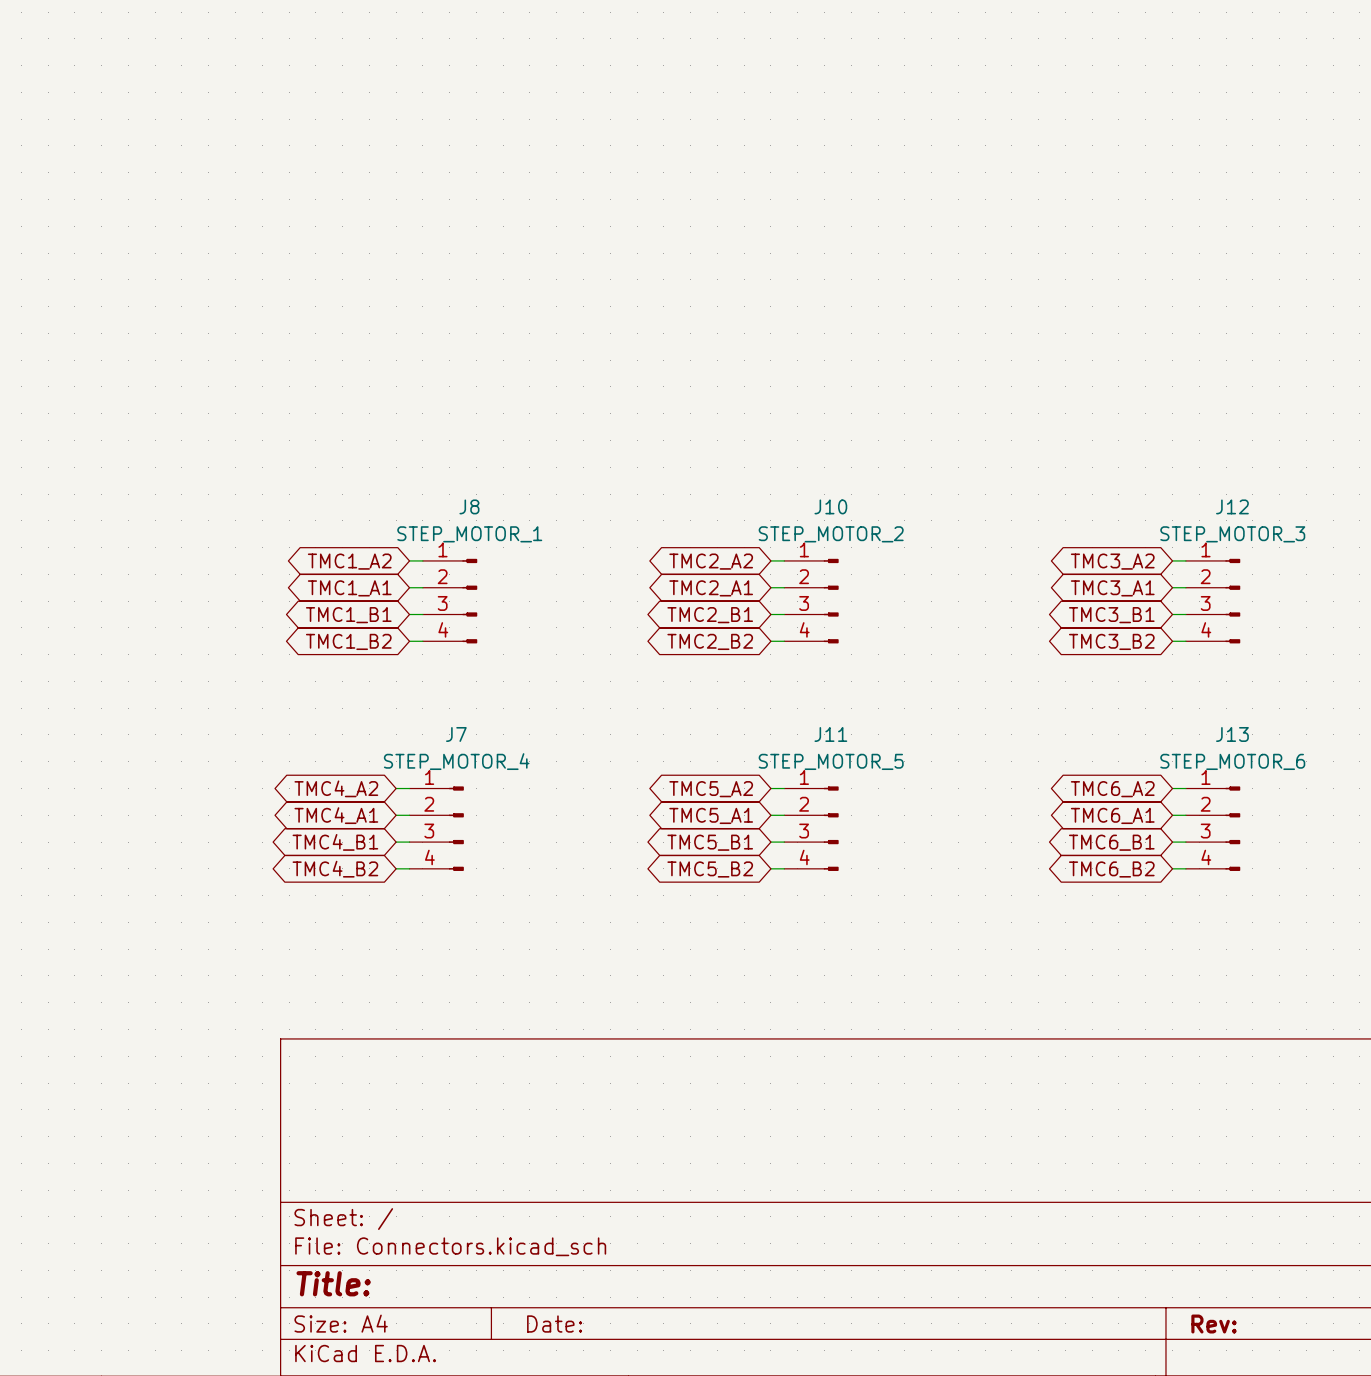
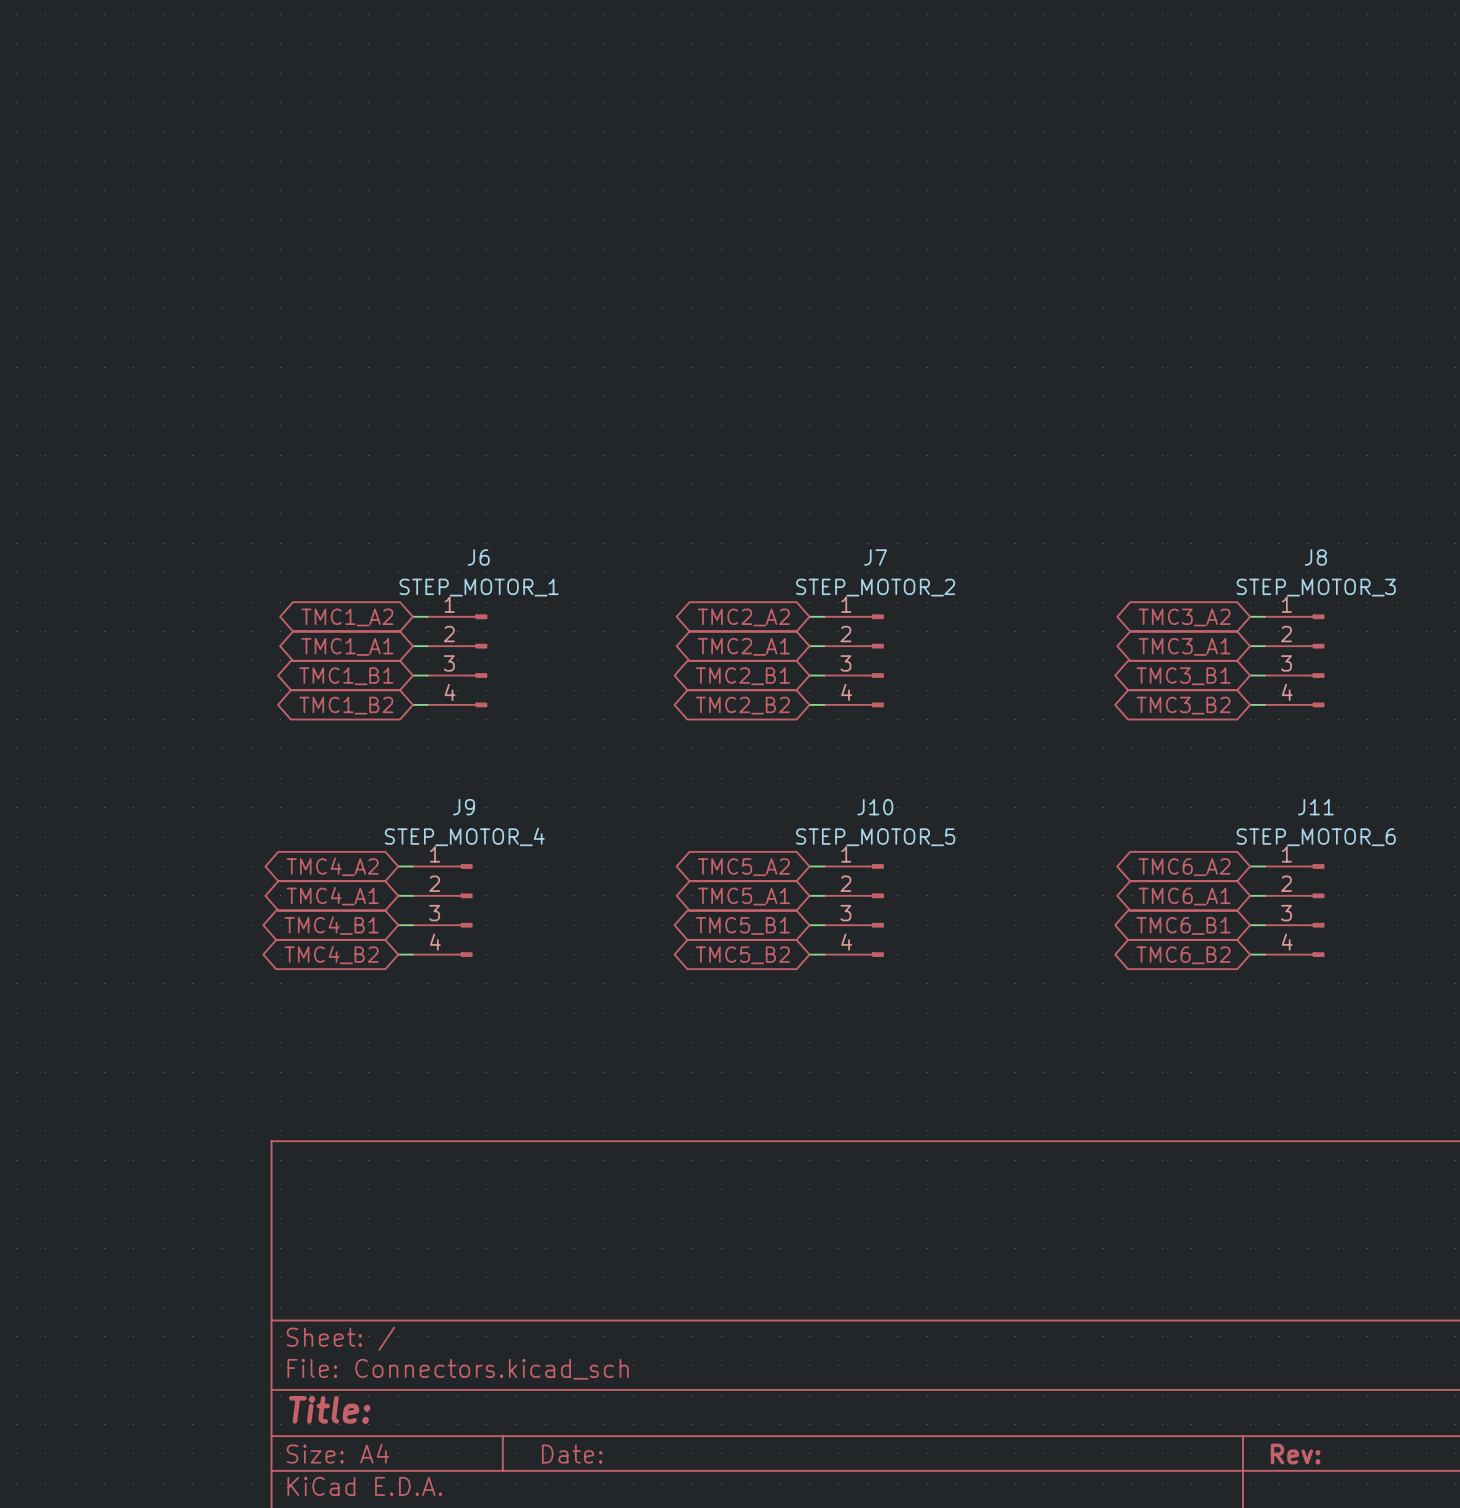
J8 name: J8 (469, 506) -> J6 (478, 557)
J10 name: J10 (830, 506) -> J7 (875, 557)
J12 name: J12 (1232, 506) -> J8 (1315, 557)
J7 name: J7 (456, 734) -> J9 (464, 807)
J11 name: J11 (830, 734) -> J10 (875, 807)
J13 name: J13 (1232, 734) -> J11 (1315, 807)

